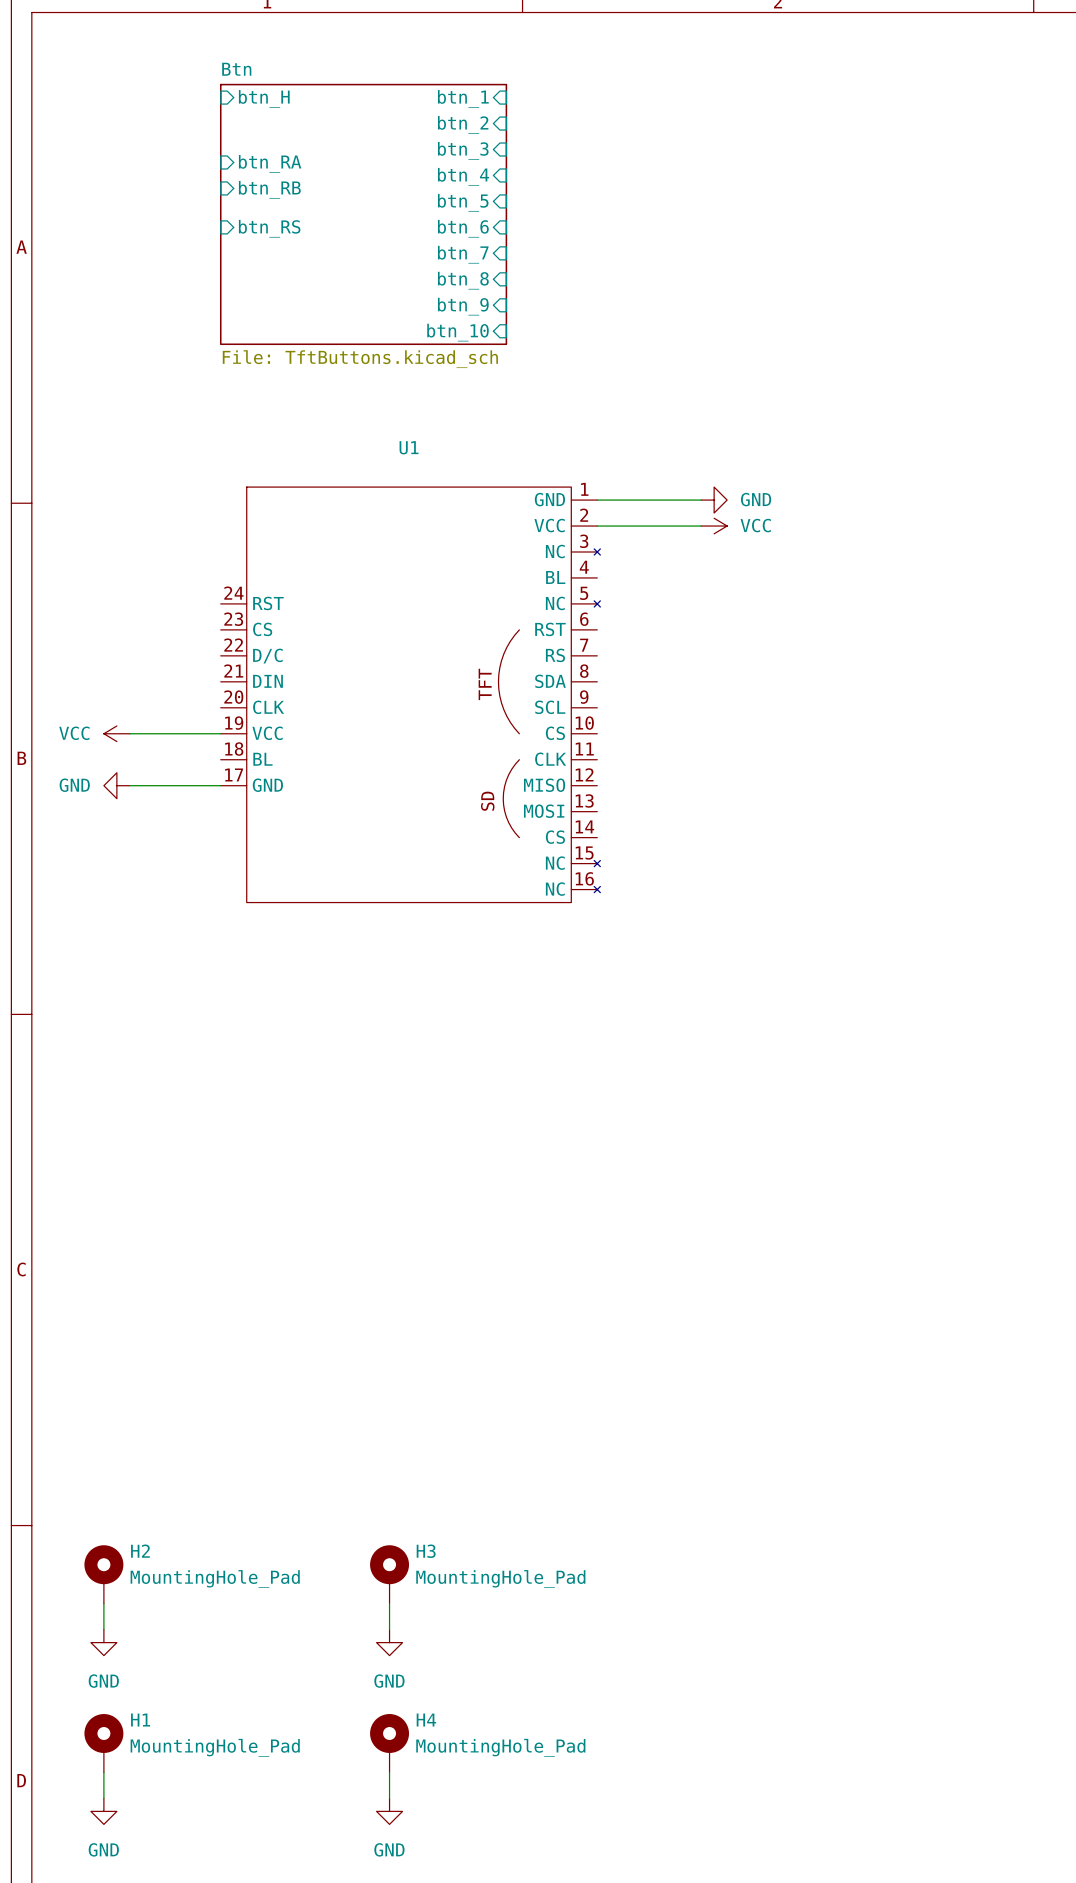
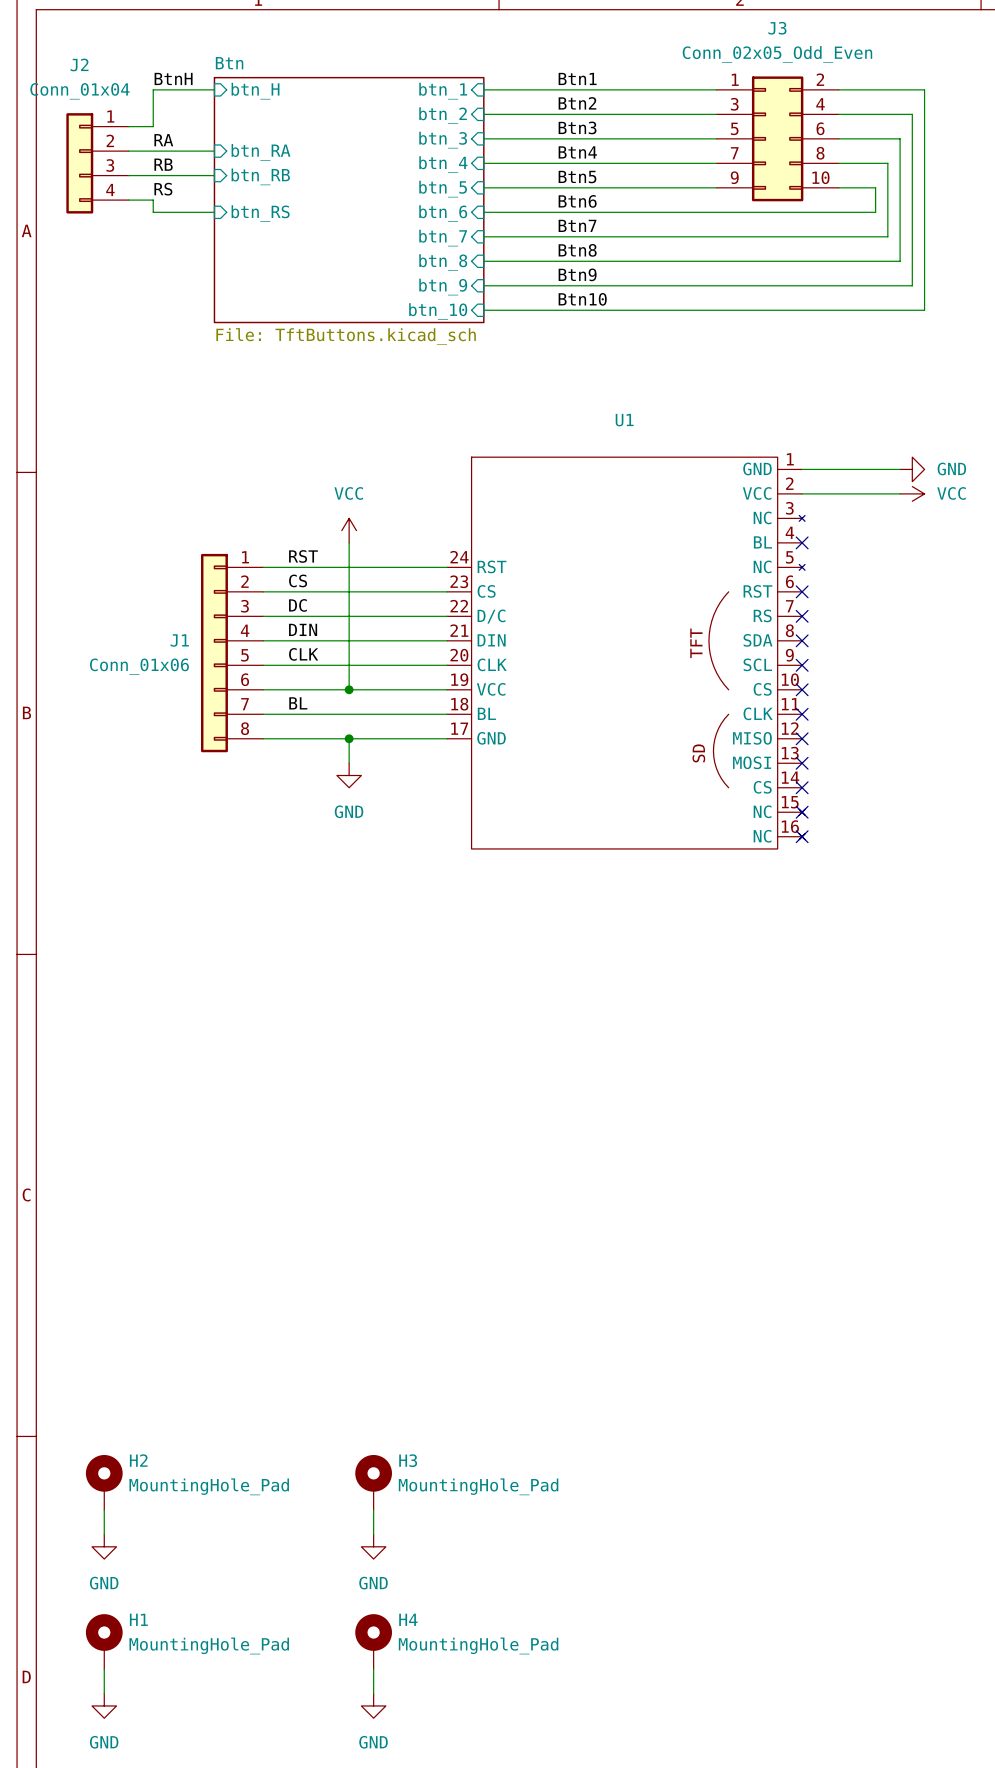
label: none -> BtnH (173, 78)
label: none -> Btn1 (577, 78)
wire: none -> (214, 89) (153, 89) (153, 126) (128, 126)
wire: none -> (483, 89) (716, 89)
wire: none -> (838, 89) (924, 89) (924, 310) (483, 310)
label: none -> Btn2 (577, 103)
wire: none -> (483, 114) (716, 114)
wire: none -> (838, 114) (912, 114) (912, 285) (483, 285)
label: none -> Btn3 (577, 127)
wire: none -> (483, 138) (716, 138)
J3: none -> Conn_02x05_Odd_Even (777, 138)
wire: none -> (838, 138) (900, 138) (900, 261) (483, 261)
label: none -> RA (163, 140)
wire: none -> (128, 151) (214, 151)
label: none -> Btn4 (577, 152)
J2: none -> Conn_01x04 (97, 163)
wire: none -> (483, 163) (716, 163)
wire: none -> (838, 163) (887, 163) (887, 236) (483, 236)
label: none -> RB (163, 164)
wire: none -> (128, 175) (214, 175)
label: none -> Btn5 (577, 177)
wire: none -> (483, 187) (716, 187)
wire: none -> (838, 187) (875, 187) (875, 212) (483, 212)
label: none -> RS (163, 189)
wire: none -> (128, 200) (153, 200) (153, 212) (214, 212)
label: none -> Btn6 (577, 201)
label: none -> Btn7 (577, 225)
label: none -> Btn8 (577, 250)
label: none -> Btn9 (577, 274)
label: none -> Btn10 (582, 299)
wire: (597, 500) (701, 500) -> (802, 469) (900, 469)
power symbol: GND (714, 500) -> none
power symbol: none -> GND (912, 469)
wire: (597, 526) (701, 526) -> (802, 493) (900, 493)
power symbol: VCC (714, 526) -> none
power symbol: none -> VCC (912, 493)
power symbol: none -> VCC (349, 530)
wire: none -> (349, 542) (349, 689)
no-connect mark: none -> (802, 542)
label: none -> RST (303, 556)
wire: none -> (263, 567) (447, 567)
label: none -> CS (298, 580)
wire: none -> (263, 591) (447, 591)
no-connect mark: none -> (802, 591)
label: none -> DC (297, 605)
wire: none -> (263, 616) (447, 616)
no-connect mark: none -> (802, 616)
label: none -> DIN (303, 629)
wire: none -> (263, 640) (447, 640)
no-connect mark: none -> (802, 640)
J1: none -> Conn_01x06 (232, 653)
U1 position: (410, 694) -> (626, 653)
label: none -> CLK (303, 654)
wire: none -> (263, 665) (447, 665)
no-connect mark: none -> (802, 665)
power symbol: VCC (116, 733) -> none
wire: (129, 733) (220, 733) -> none
wire: none -> (263, 689) (447, 689)
junction: none -> (349, 689)
no-connect mark: none -> (802, 689)
label: none -> BL (298, 703)
wire: none -> (263, 714) (447, 714)
no-connect mark: none -> (802, 714)
power symbol: GND (116, 785) -> none
wire: (129, 785) (220, 785) -> none
wire: none -> (263, 738) (447, 738)
wire: none -> (349, 738) (349, 763)
junction: none -> (349, 738)
no-connect mark: none -> (802, 738)
no-connect mark: none -> (802, 763)
power symbol: none -> GND (349, 775)
no-connect mark: none -> (802, 787)
no-connect mark: none -> (802, 812)
no-connect mark: none -> (802, 836)

